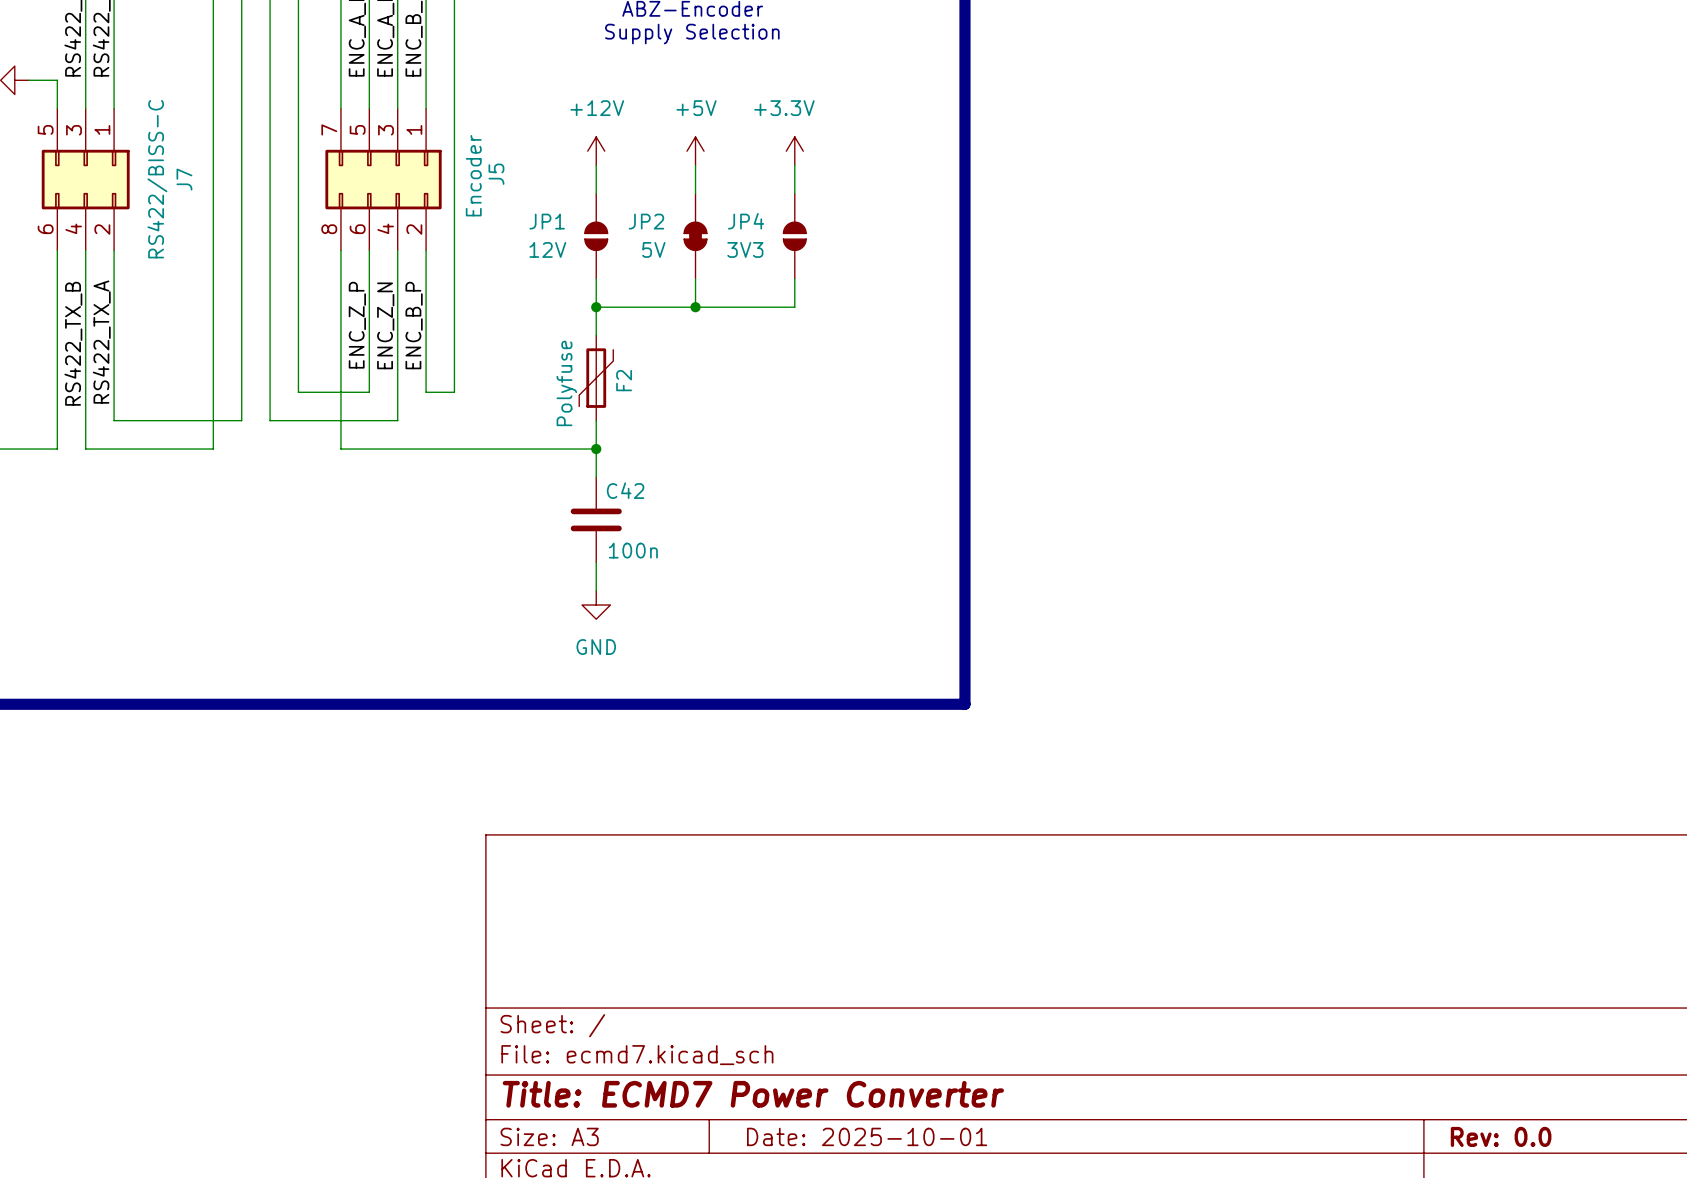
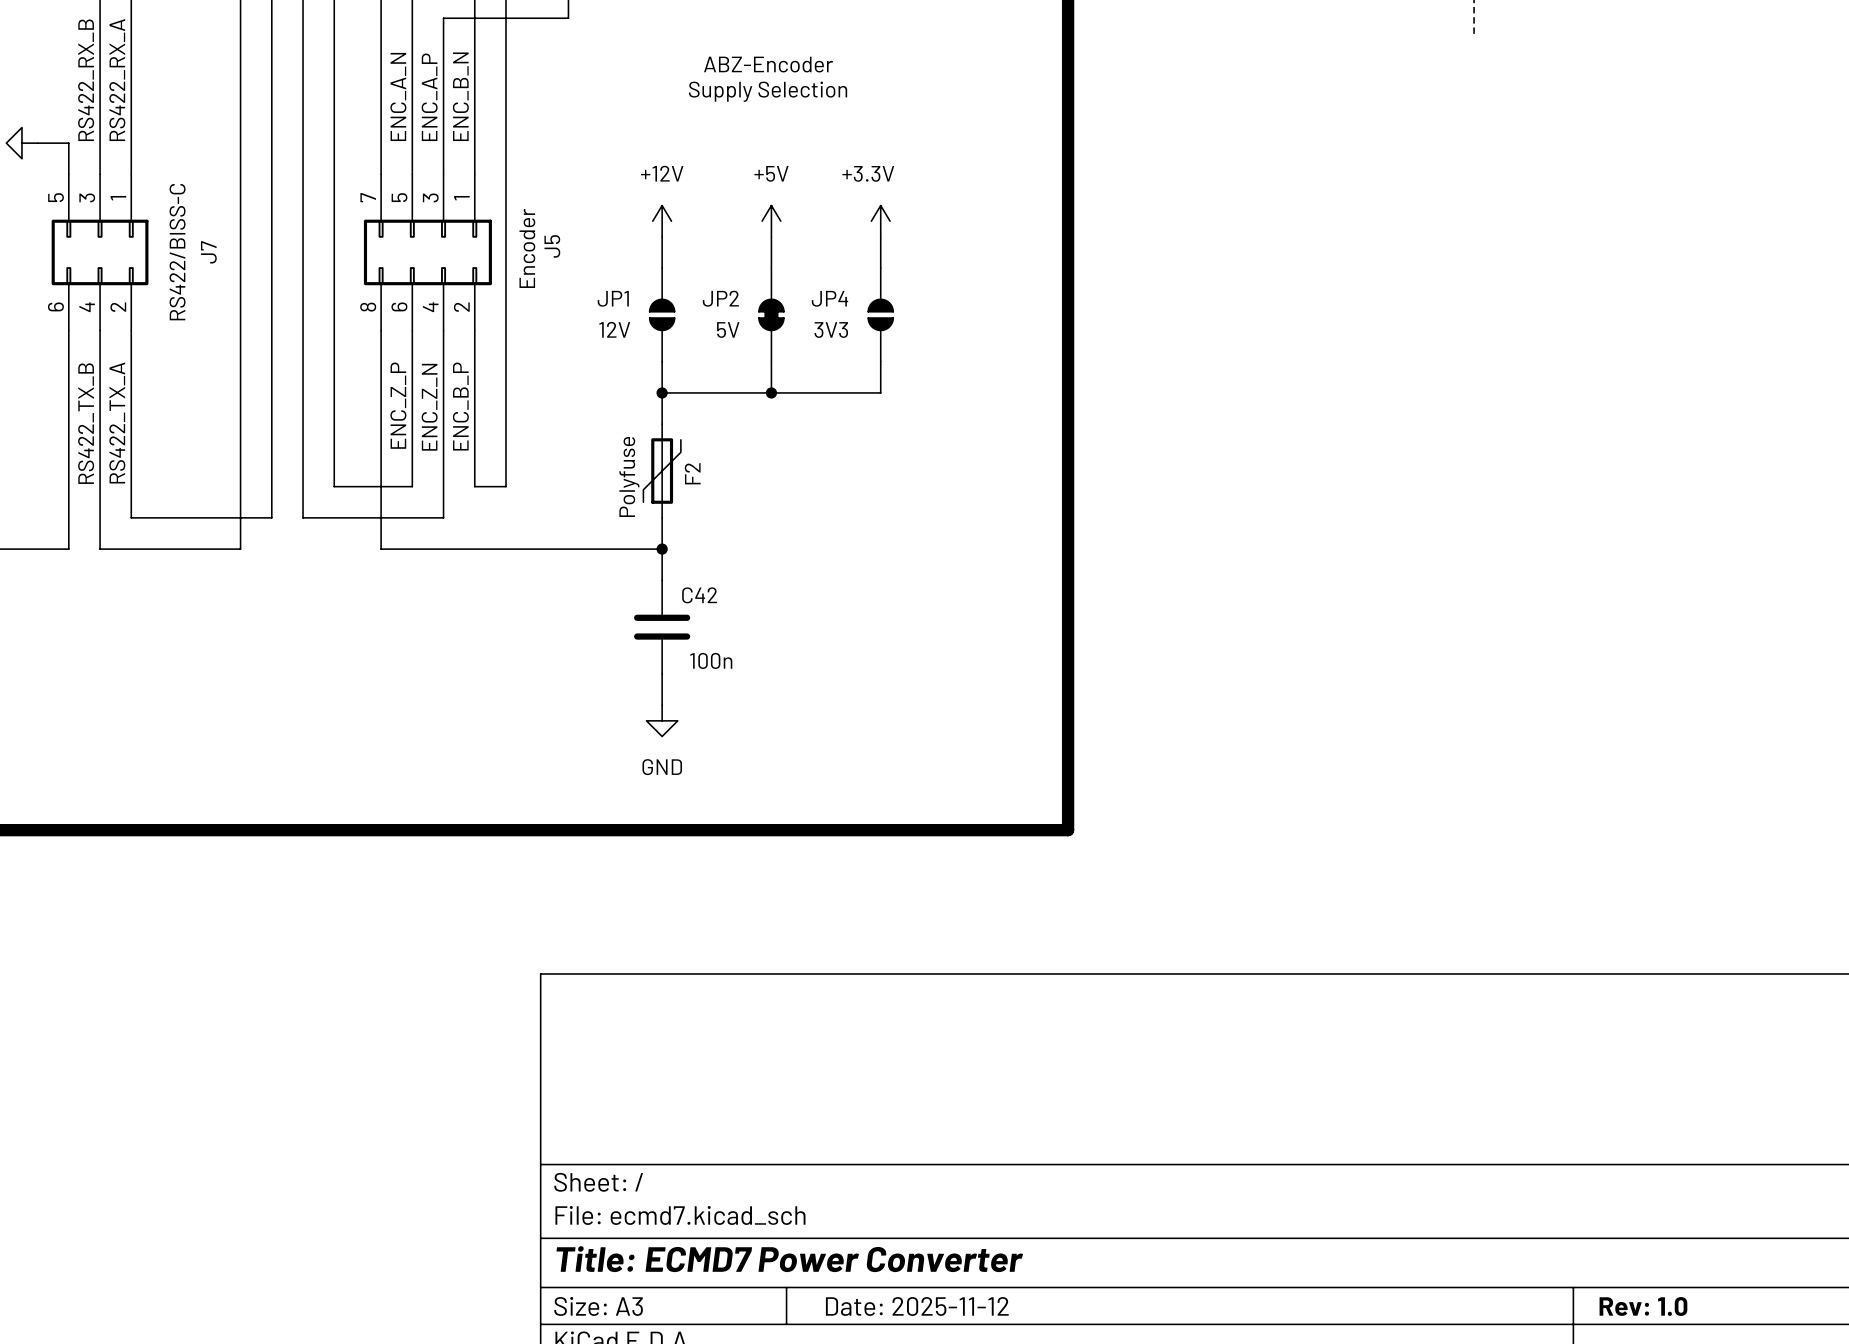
title block: Date: 2025-10-01 (867, 1136) -> Date: 2025-11-12 (917, 1306)
title block: Rev: 0.0 (1501, 1136) -> Rev: 1.0 (1643, 1306)

